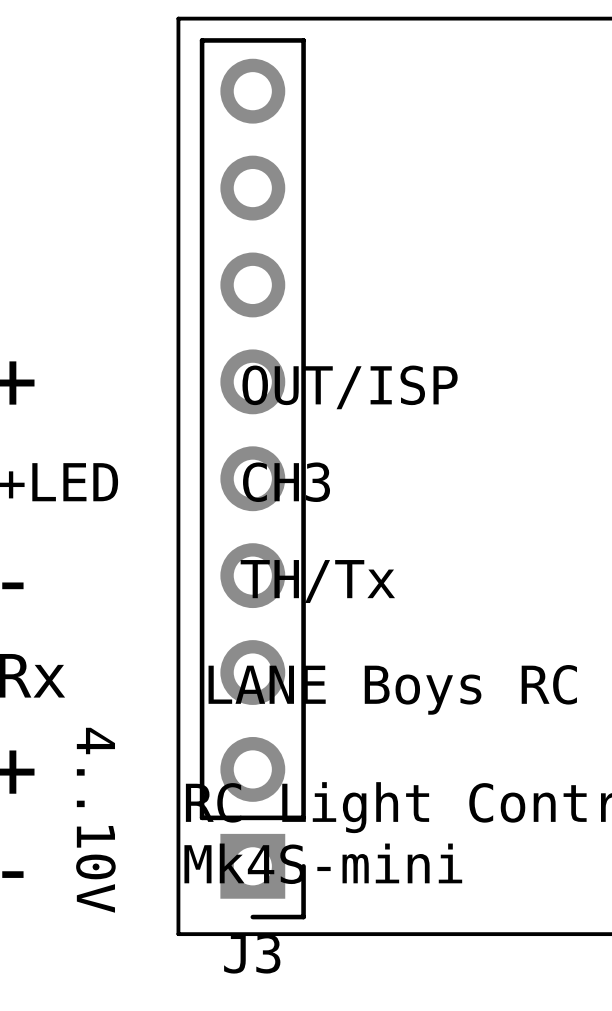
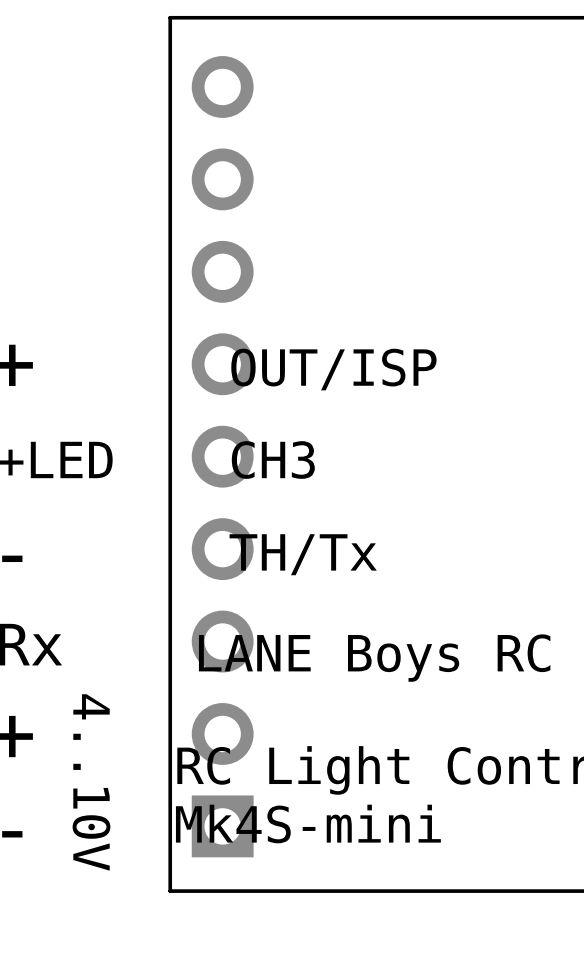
J3 side: bottom (252, 478) -> top (222, 456)

